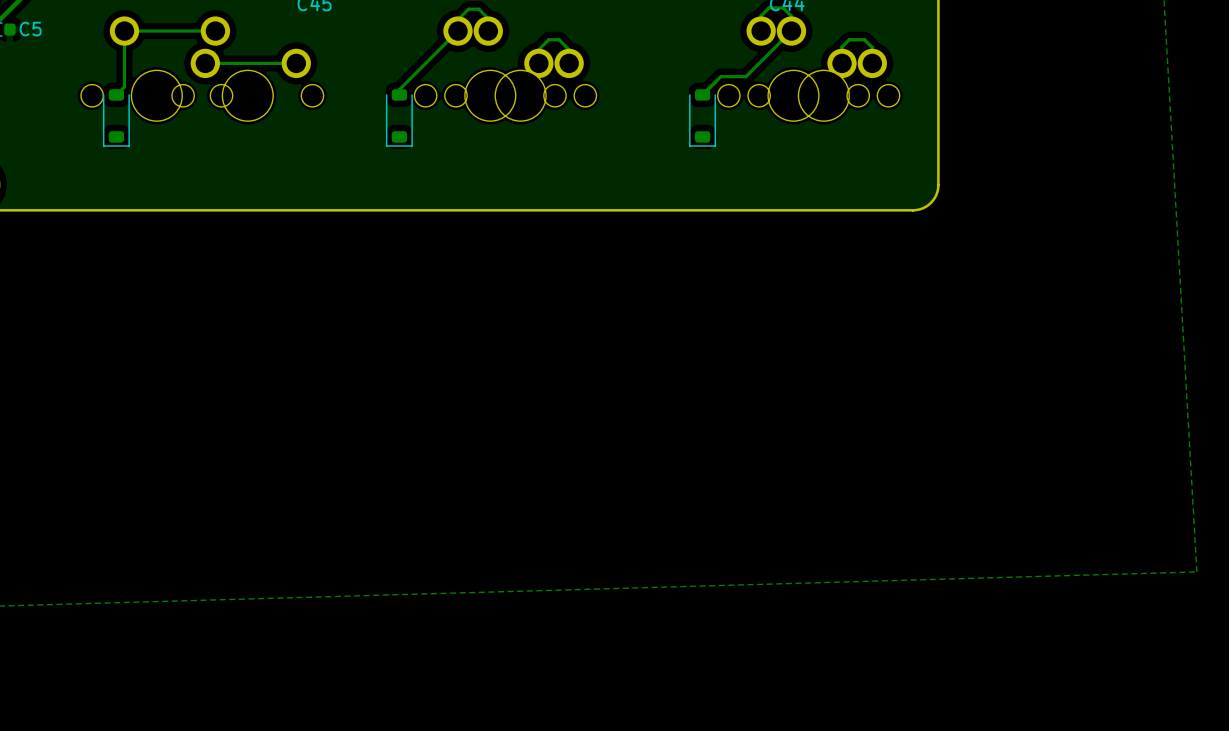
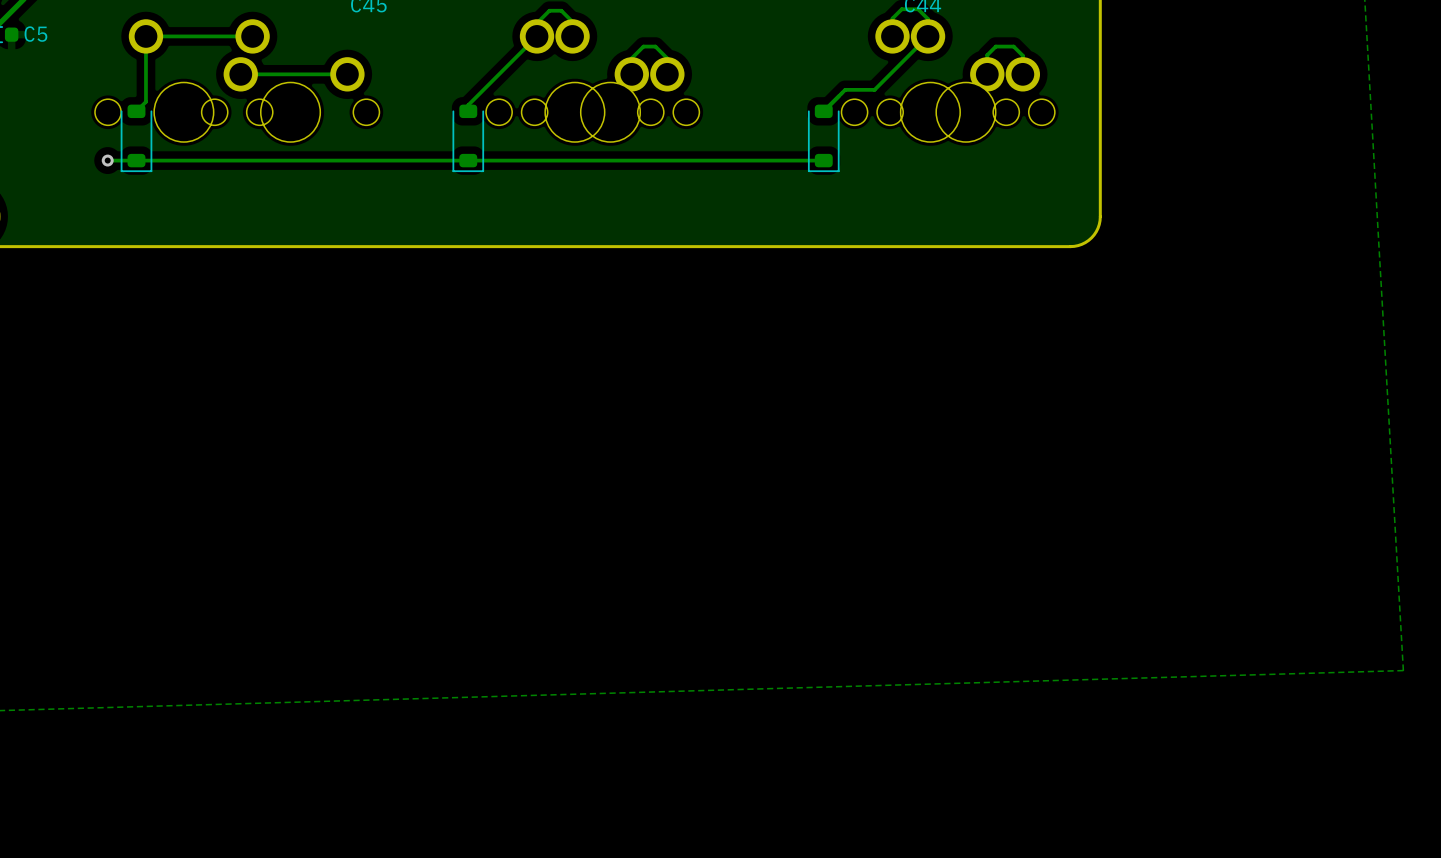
via: none -> (107, 160)
track: none -> (823, 160) (107, 160)

